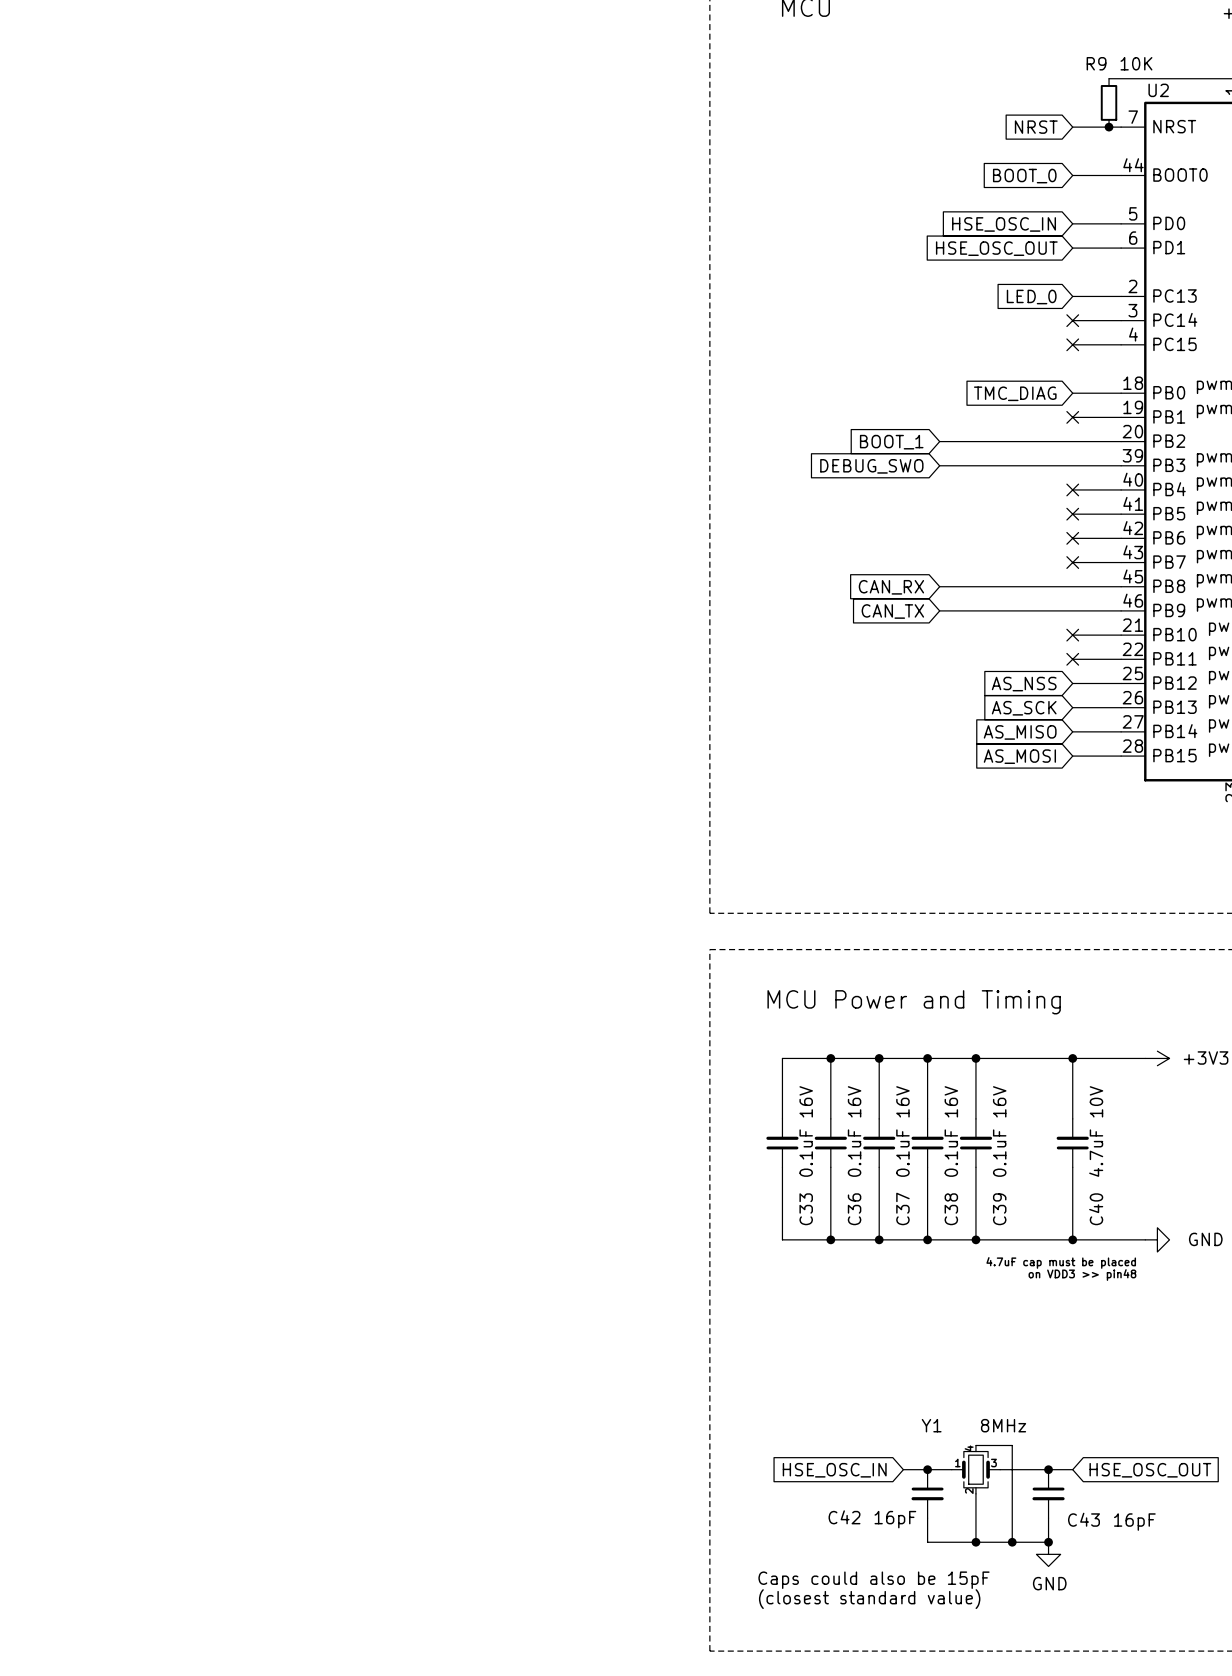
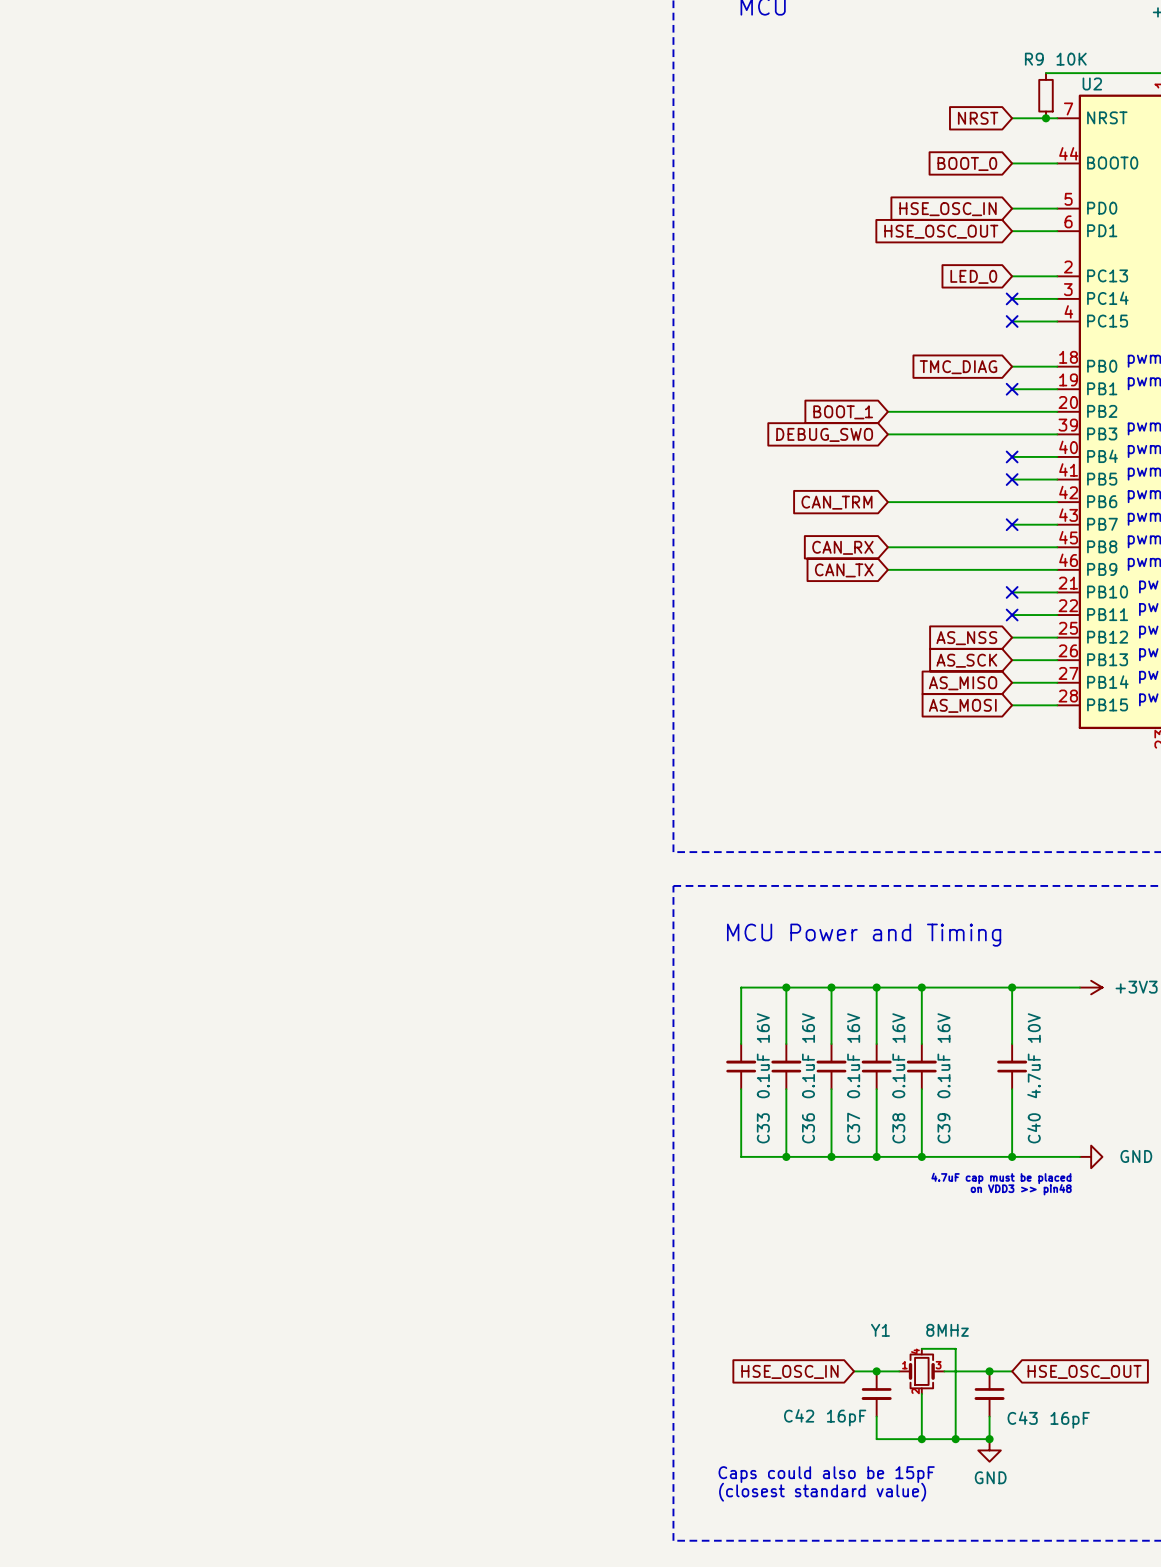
global label: none -> CAN_TRM (836, 502)
wire: none -> (887, 502) (1012, 502)
no-connect mark: (1072, 538) -> none

